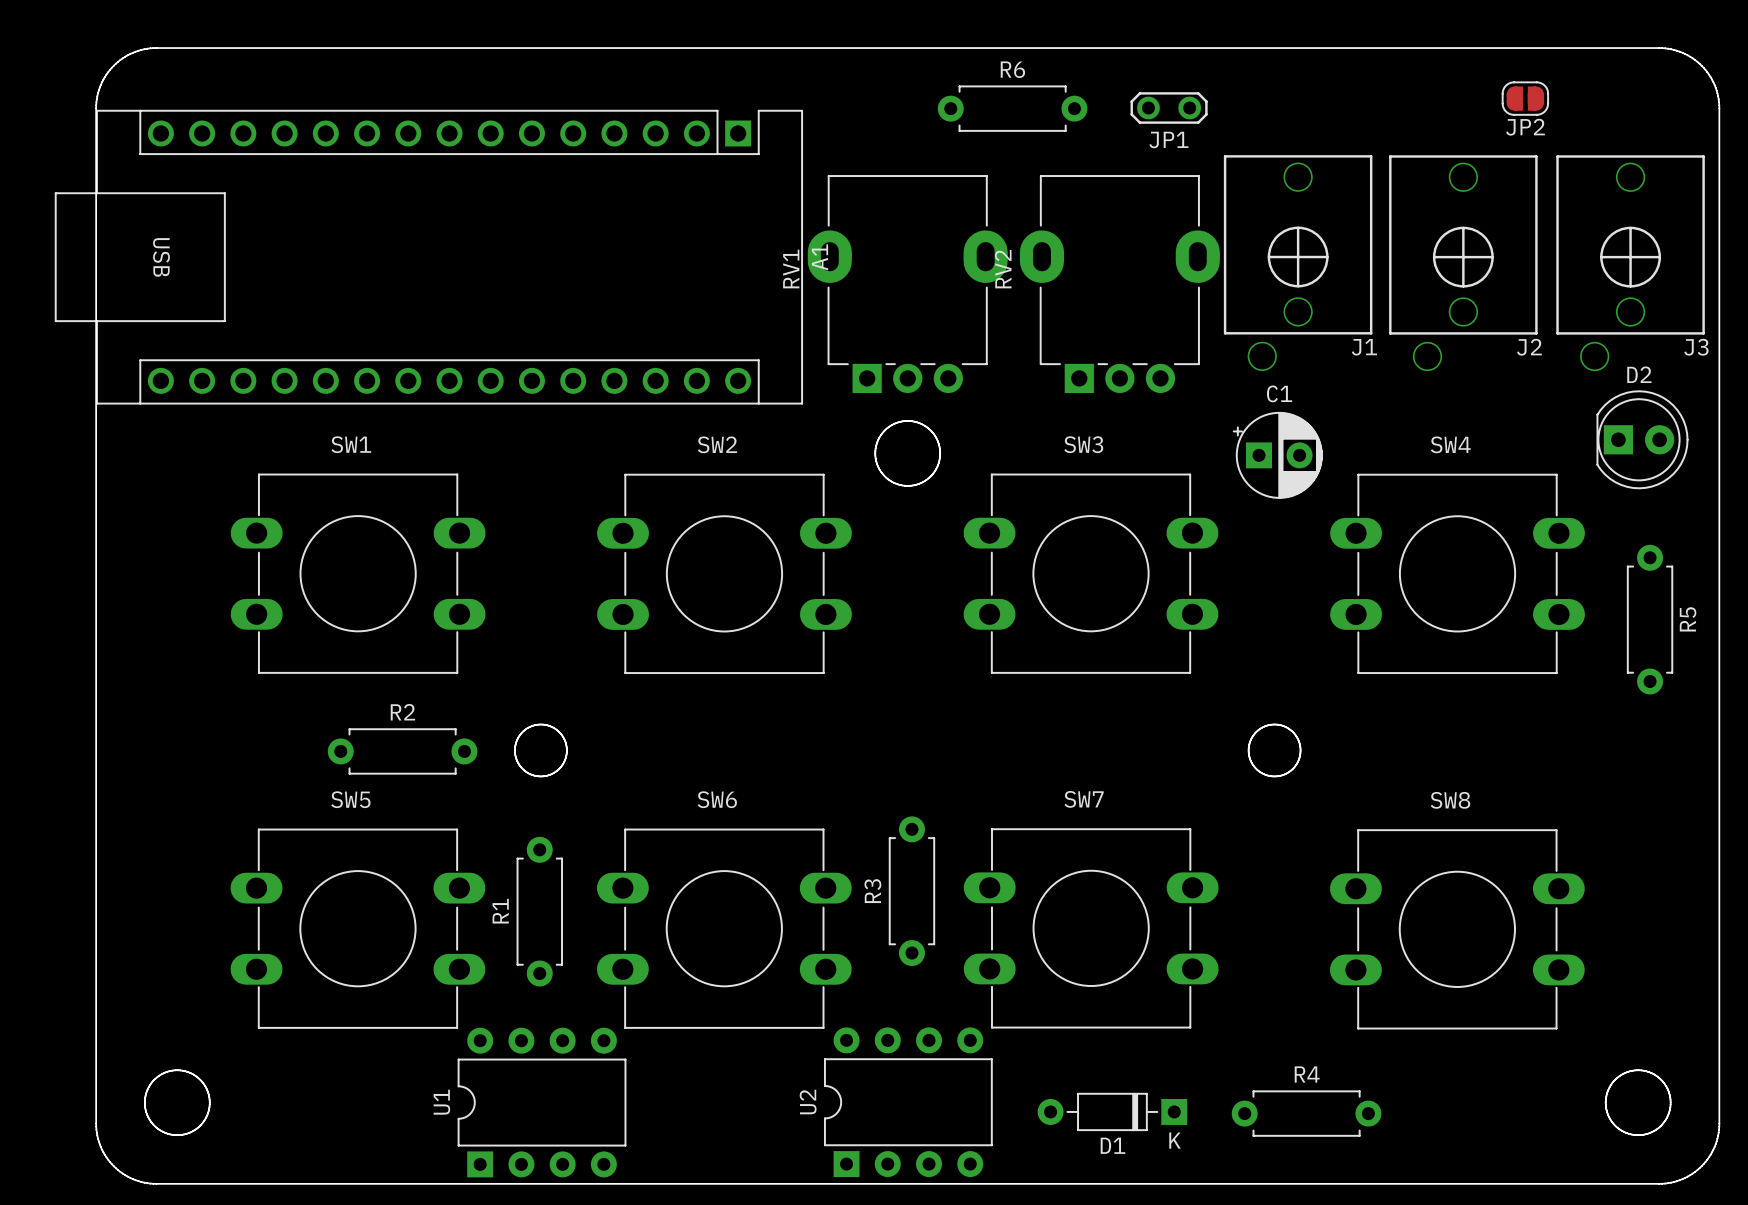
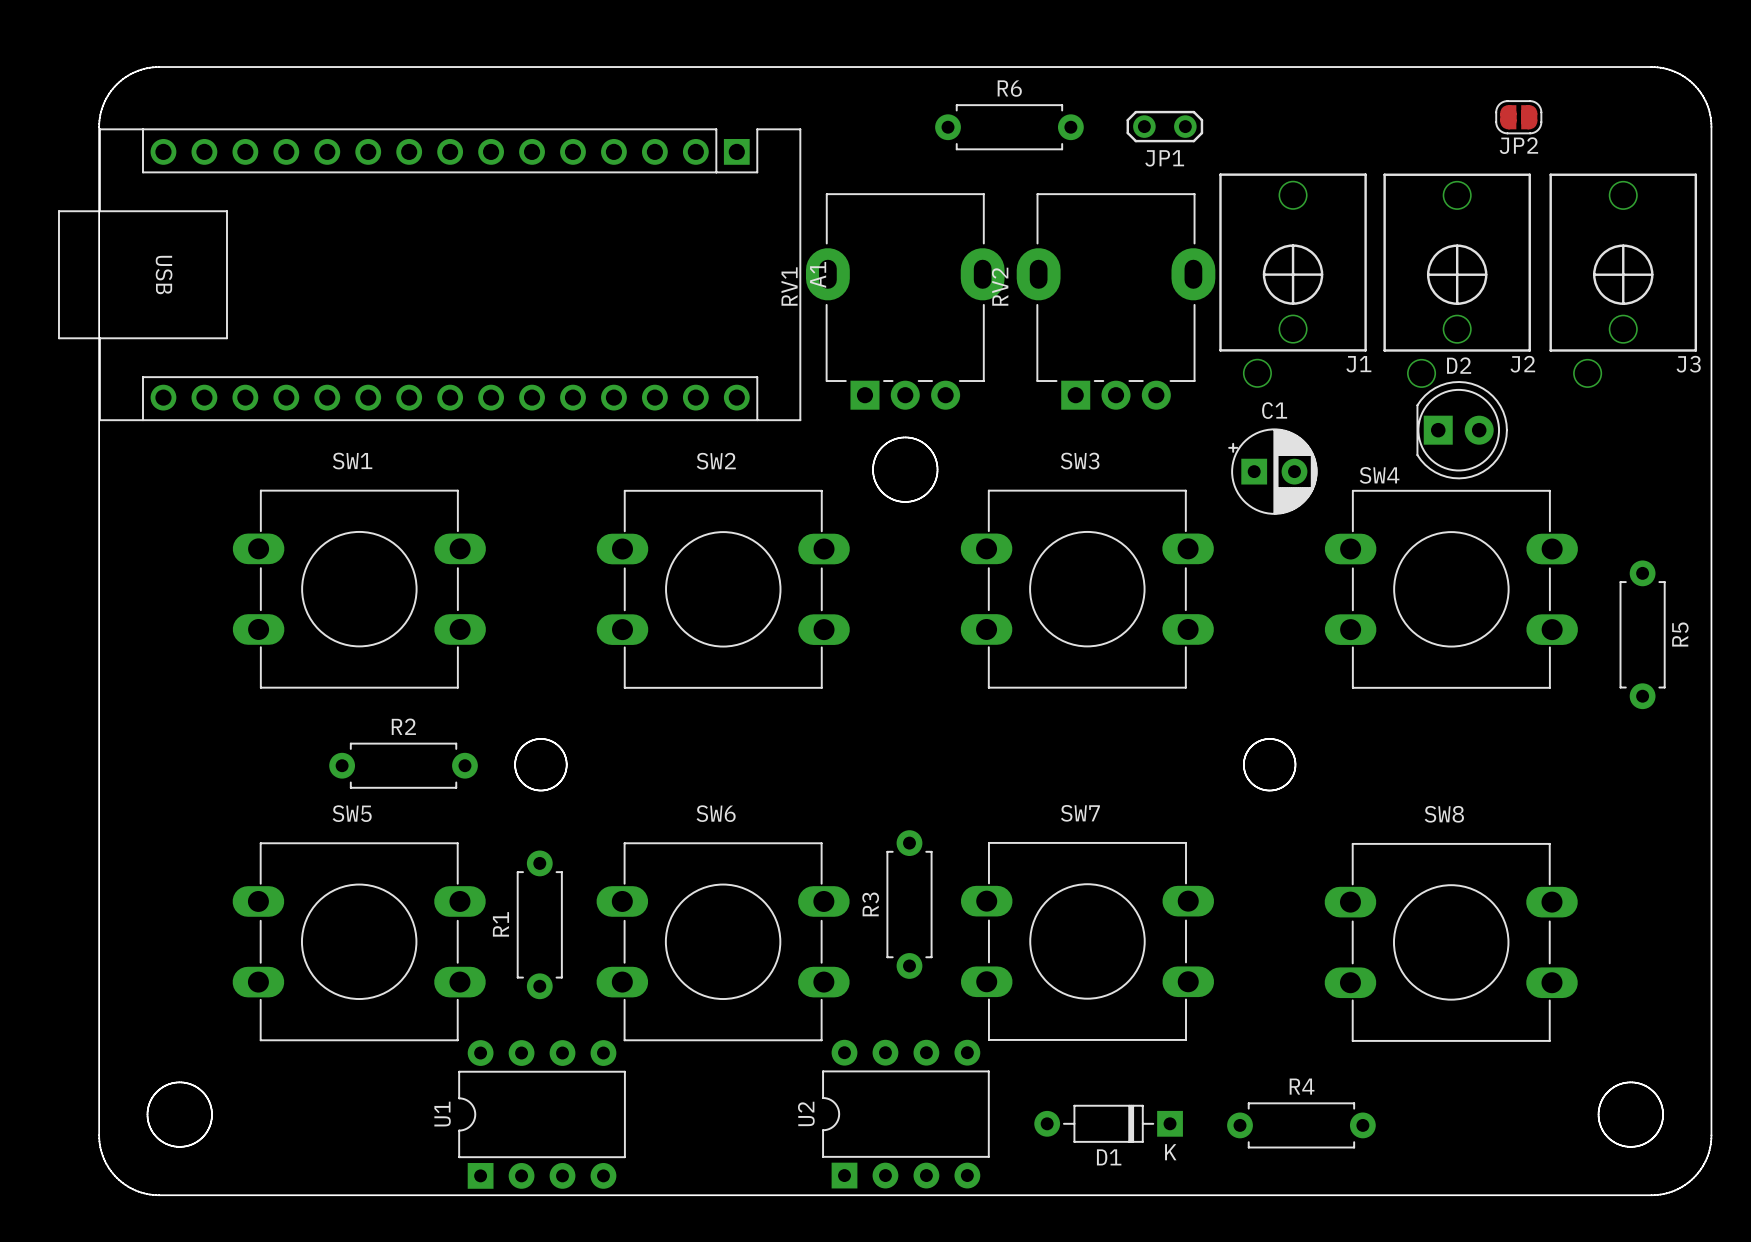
D2 position: (1642, 439) -> (1462, 430)
SW4 name position: SW4 (1450, 444) -> SW4 (1379, 475)

